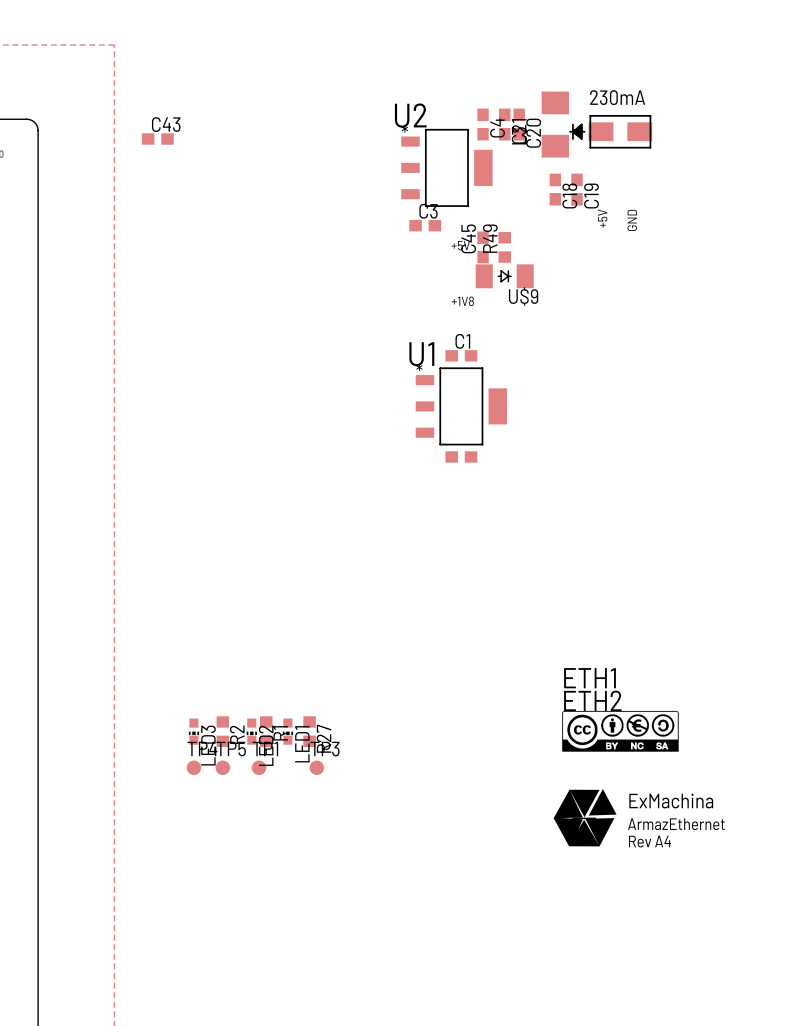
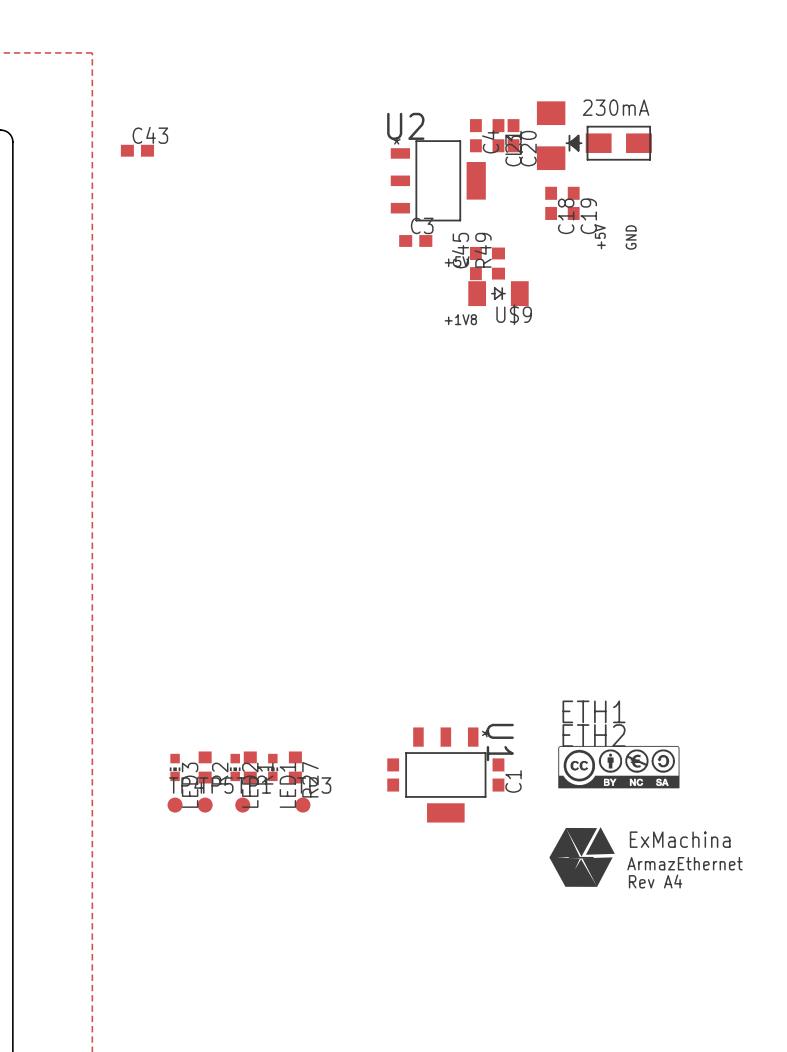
C1 rotation: 0° (461, 355) -> 90° clockwise (498, 774)
C1 position: (461, 355) -> (498, 774)
U1 rotation: 0° (461, 406) -> 90° clockwise (445, 774)
U1 position: (461, 406) -> (445, 774)
part: (461, 456) -> none
part: none -> (393, 774)

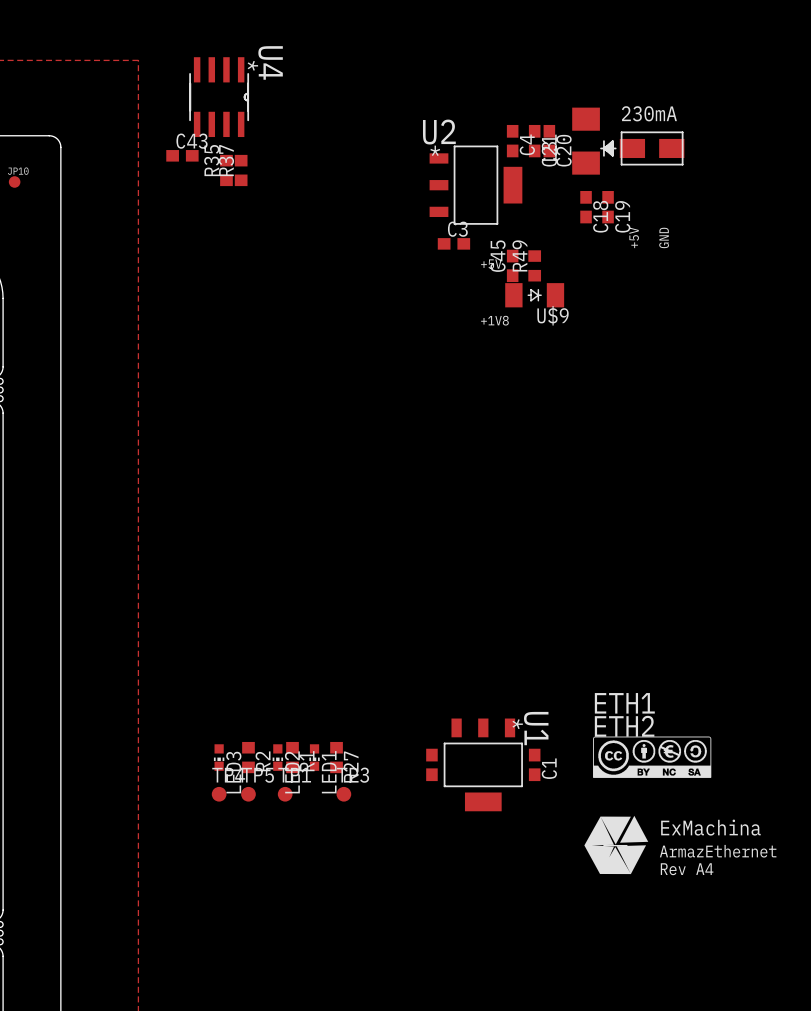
U4: none -> (219, 97)
R35: none -> (226, 170)
R37: none -> (241, 170)

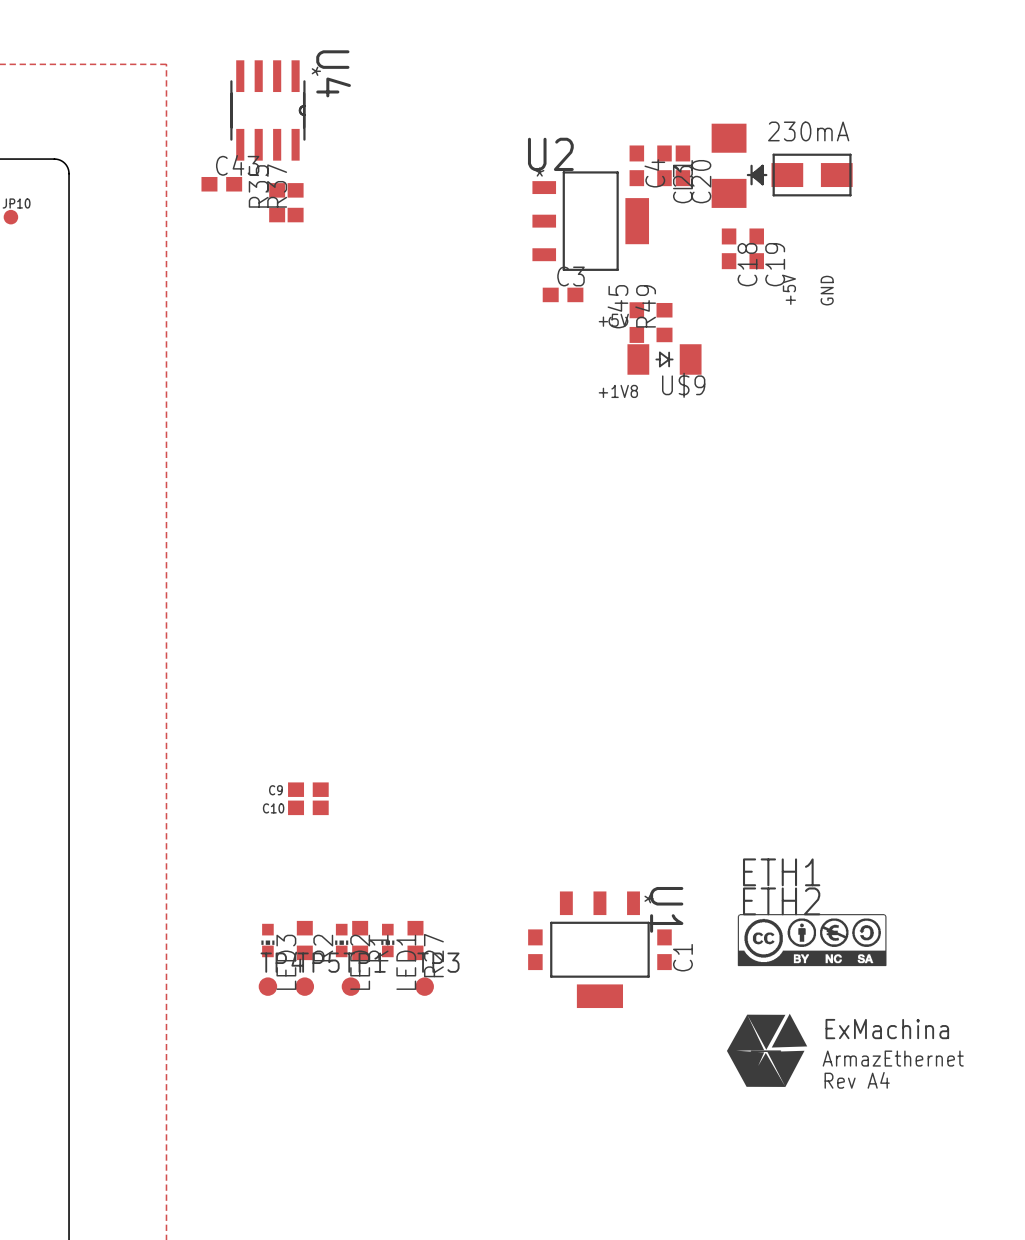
C9: none -> (308, 789)
C10: none -> (308, 807)

